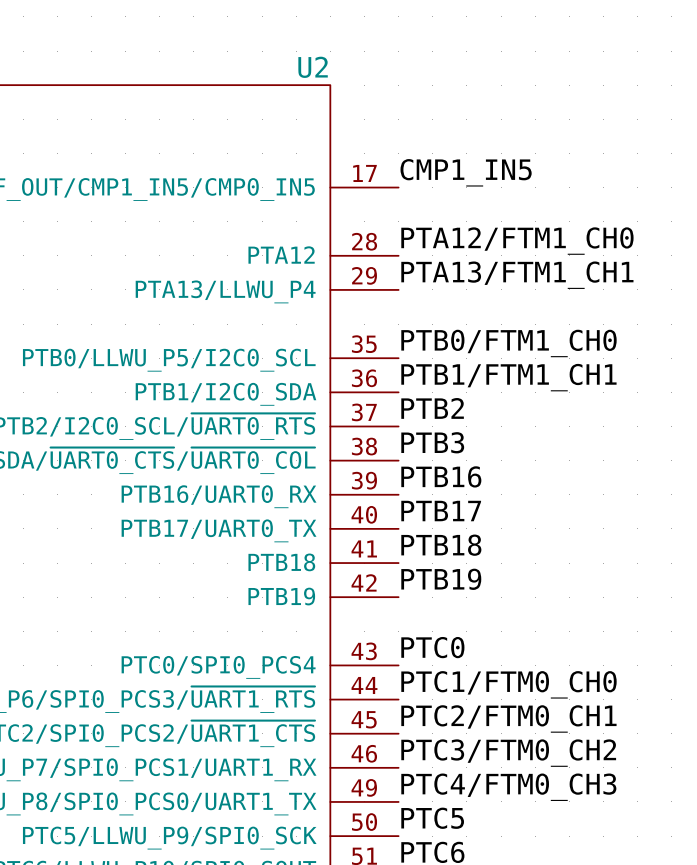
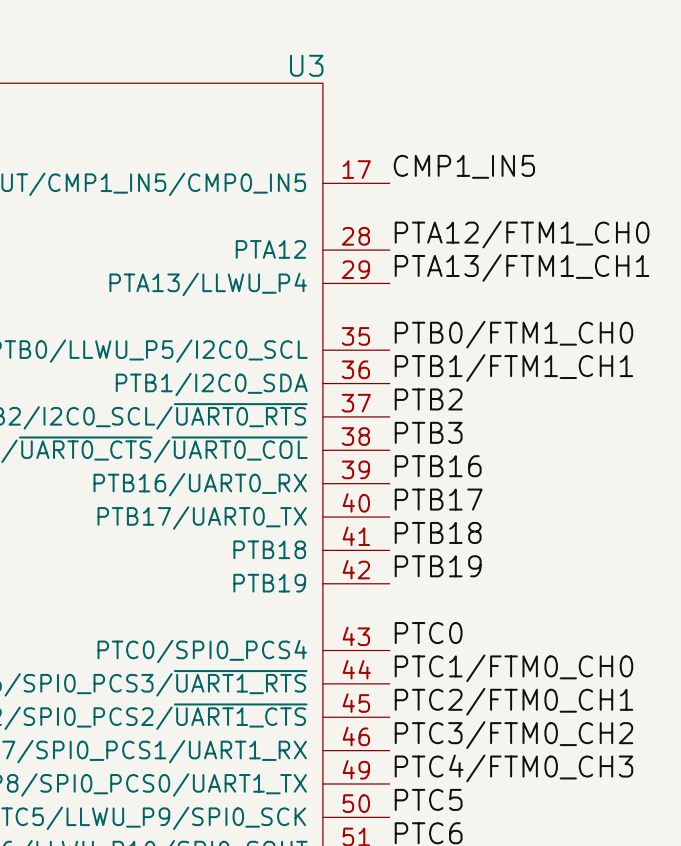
U2 name: U2 (313, 67) -> U3 (306, 65)

